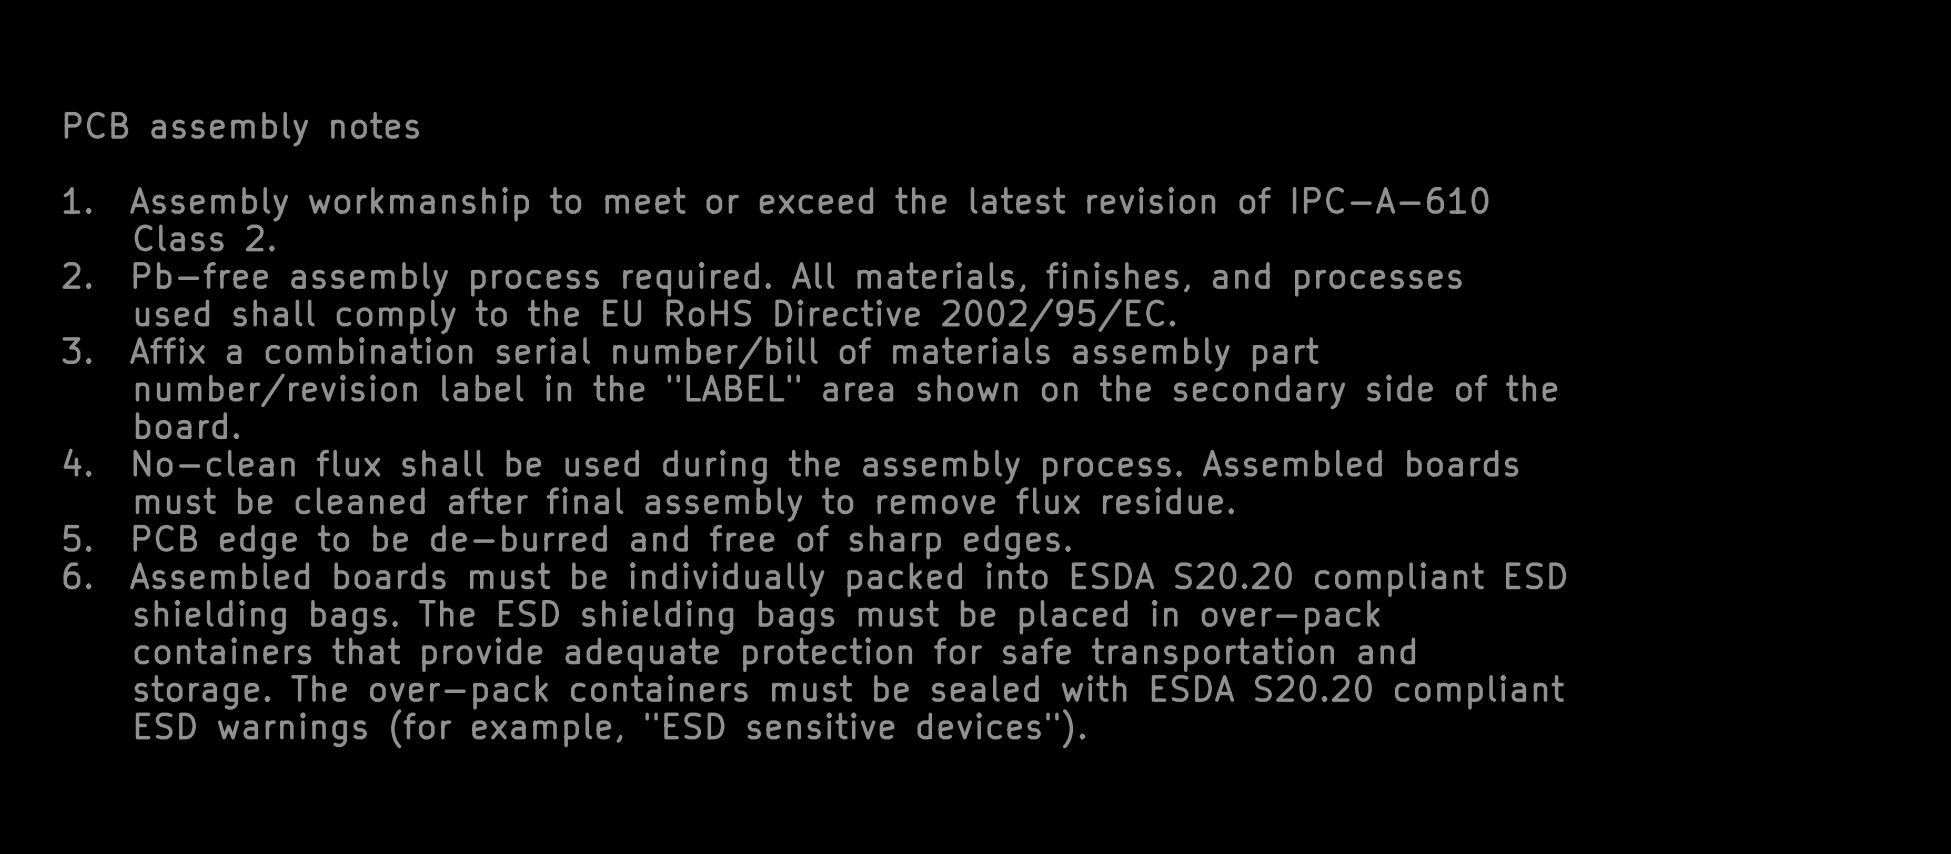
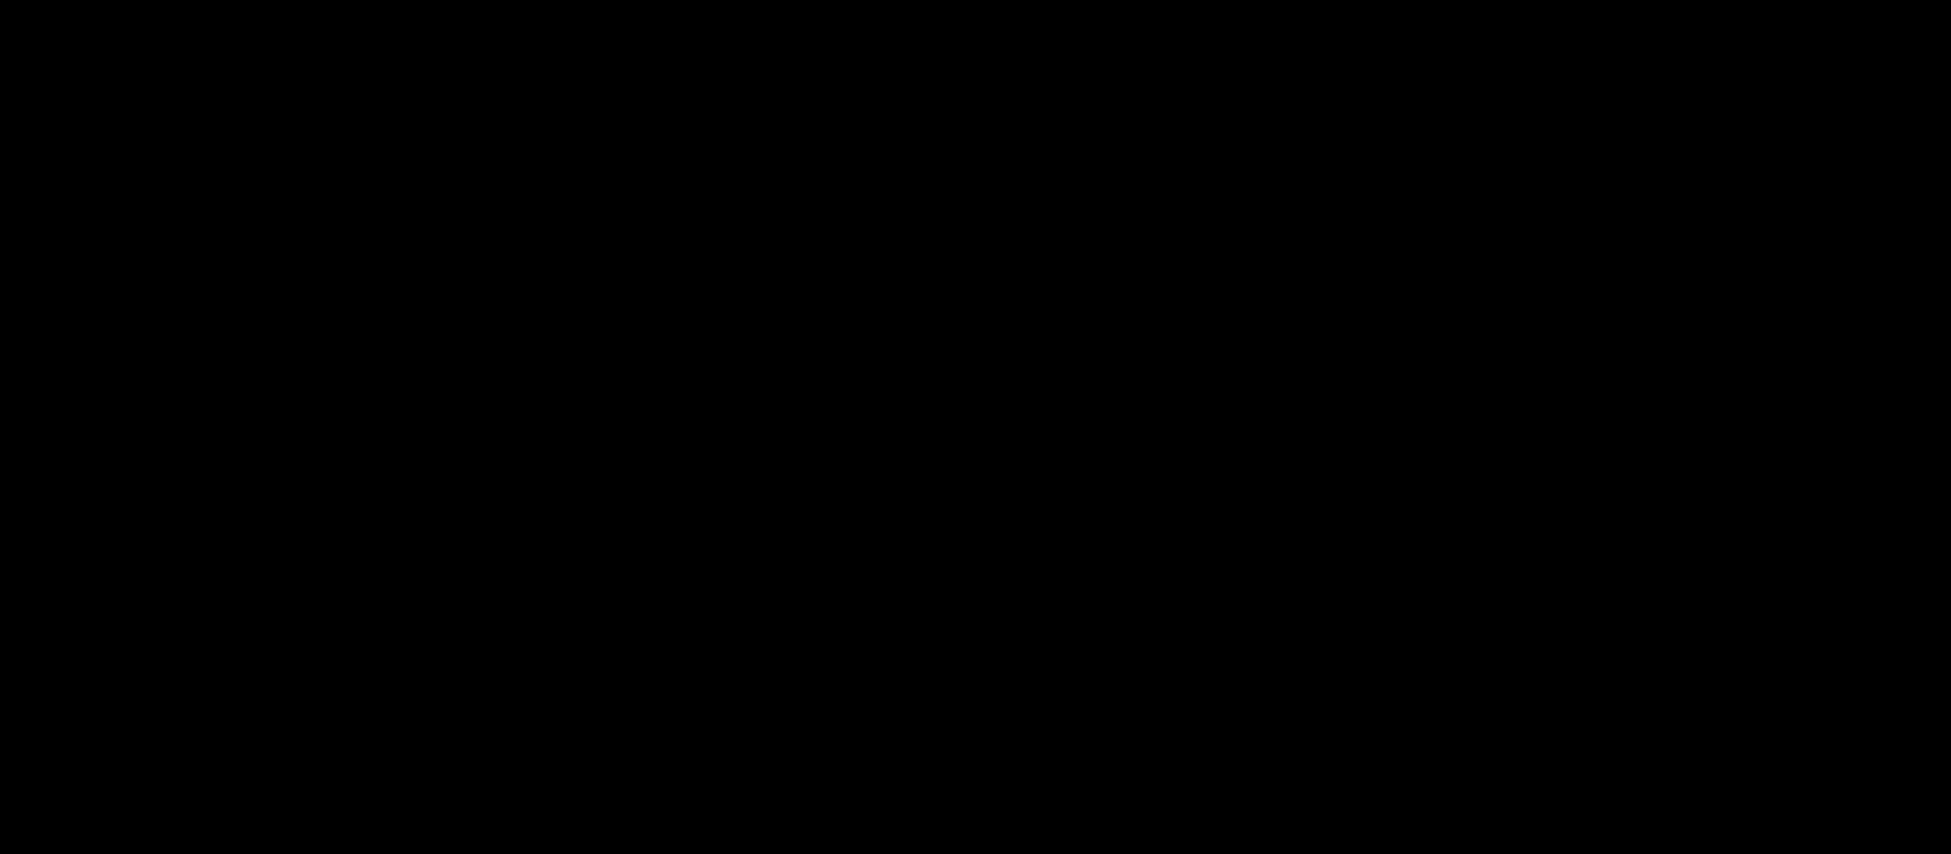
text: PCB assembly notes (241, 129) -> none
text: 1. Assembly workmanship to meet or exceed the latest revision of IPC-A-610 (775, 204) -> none
text: Class 2. (204, 237) -> none
text: 2. Pb-free assembly process required. All materials, finishes, and processes (762, 279) -> none
text: used shall comply to the EU RoHS Directive 2002/95/EC. (655, 316) -> none
text: 3. Affix a combination serial number/bill of materials assembly part (690, 353) -> none
text: number/revision label in the "LABEL" area shown on the secondary side of the (846, 391) -> none
text: board. (187, 425) -> none
text: 4. No-clean flux shall be used during the assembly process. Assembled boards (790, 466) -> none
text: must be cleaned after final assembly to remove flux residue. (684, 504) -> none
text: 5. PCB edge to be de-burred and free of sharp edges. (567, 542) -> none
text: 6. Assembled boards must be individually packed into ESDA S20.20 compliant ESD (814, 579) -> none
text: shielding bags. The ESD shielding bags must be placed in over-pack (757, 617) -> none
text: containers that provide adequate protection for safe transportation and (774, 654) -> none
text: storage. The over-pack containers must be sealed with ESDA S20.20 compliant (849, 692) -> none
text: ESD warnings (for example, "ESD sensitive devices"). (610, 728) -> none

